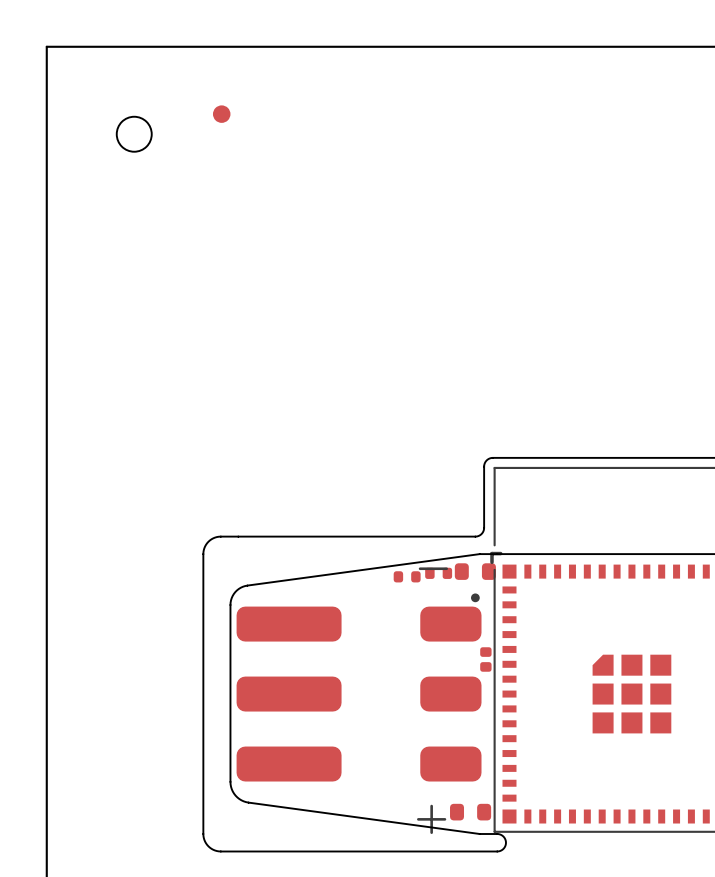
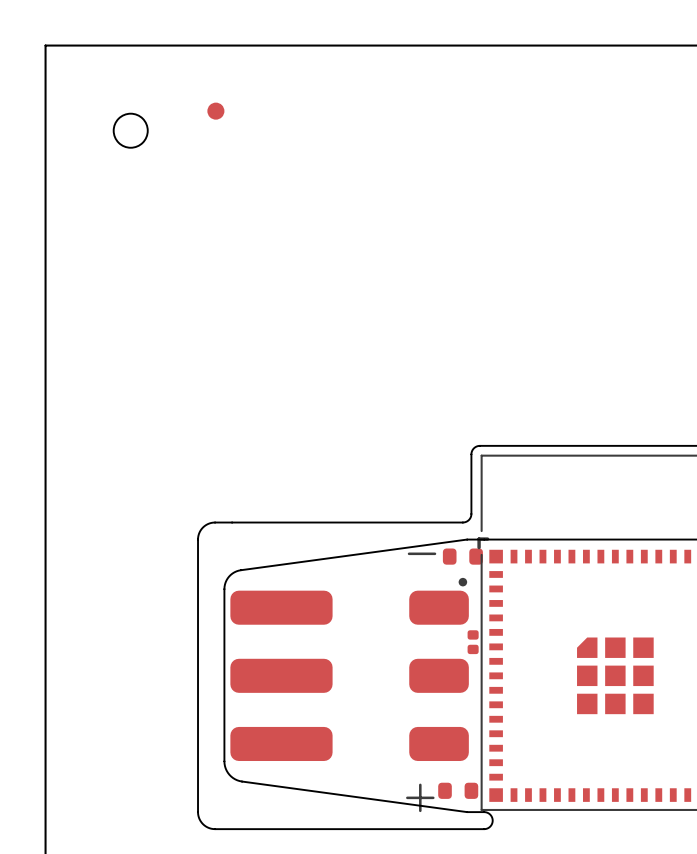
part: (438, 573) -> none
part: (407, 576) -> none

